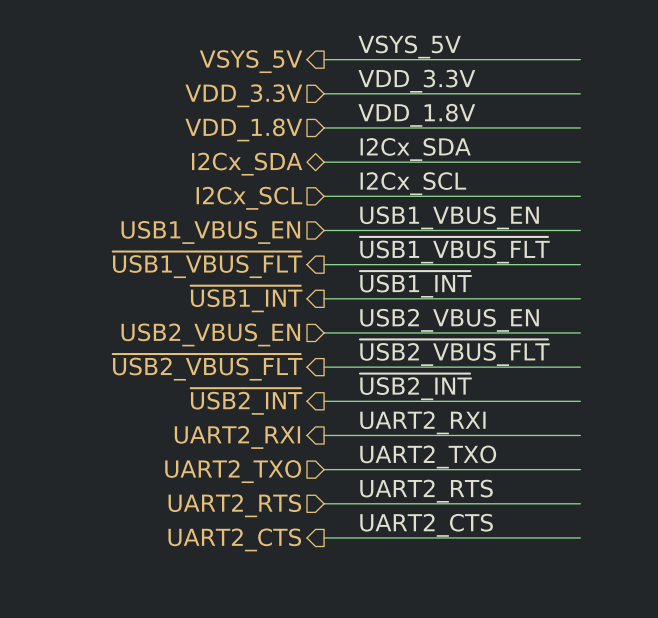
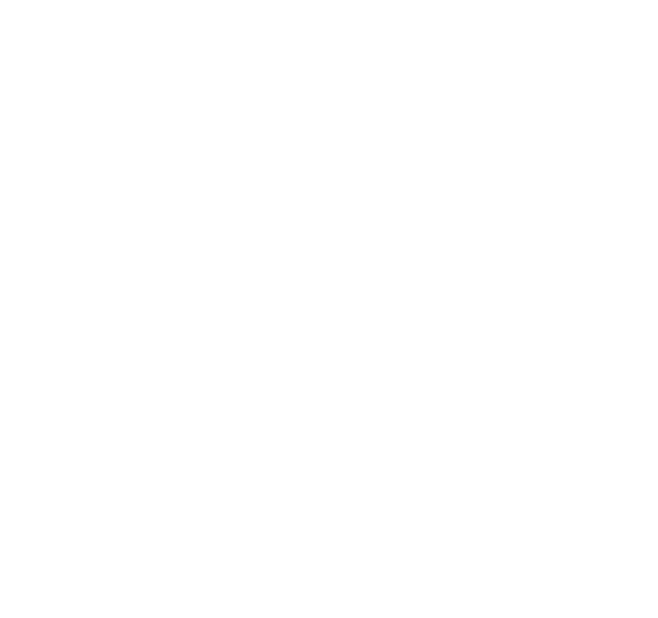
label: VSYS_5V (409, 47) -> none
wire: (324, 59) (580, 59) -> none
hierarchical label: VSYS_5V (251, 61) -> none
label: VDD_3.3V (416, 81) -> none
wire: (324, 93) (580, 93) -> none
hierarchical label: VDD_3.3V (243, 95) -> none
label: VDD_1.8V (416, 115) -> none
wire: (324, 127) (580, 127) -> none
hierarchical label: VDD_1.8V (243, 129) -> none
label: I2Cx_SDA (415, 149) -> none
wire: (324, 162) (580, 162) -> none
hierarchical label: I2Cx_SDA (247, 164) -> none
label: I2Cx_SCL (413, 183) -> none
wire: (324, 196) (580, 196) -> none
hierarchical label: I2Cx_SCL (249, 198) -> none
label: USB1_VBUS_EN (449, 217) -> none
wire: (324, 230) (580, 230) -> none
hierarchical label: USB1_VBUS_EN (210, 232) -> none
label: ~{USB1_VBUS_FLT} (454, 250) -> none
hierarchical label: ~{USB1_VBUS_FLT} (207, 264) -> none
wire: (324, 264) (580, 264) -> none
label: ~{USB1_INT} (415, 284) -> none
hierarchical label: ~{USB1_INT} (246, 298) -> none
wire: (324, 298) (580, 298) -> none
label: USB2_VBUS_EN (449, 320) -> none
wire: (324, 332) (580, 332) -> none
hierarchical label: USB2_VBUS_EN (210, 334) -> none
label: ~{USB2_VBUS_FLT} (454, 352) -> none
hierarchical label: ~{USB2_VBUS_FLT} (207, 367) -> none
wire: (324, 367) (580, 367) -> none
label: ~{USB2_INT} (415, 386) -> none
hierarchical label: ~{USB2_INT} (246, 401) -> none
wire: (324, 401) (580, 401) -> none
label: UART2_RXI (422, 422) -> none
wire: (324, 435) (580, 435) -> none
hierarchical label: UART2_RXI (237, 437) -> none
label: UART2_TXO (428, 457) -> none
wire: (324, 469) (580, 469) -> none
hierarchical label: UART2_TXO (233, 471) -> none
label: UART2_RTS (426, 491) -> none
wire: (324, 503) (580, 503) -> none
hierarchical label: UART2_RTS (234, 505) -> none
label: UART2_CTS (426, 525) -> none
wire: (324, 537) (580, 537) -> none
hierarchical label: UART2_CTS (234, 539) -> none

